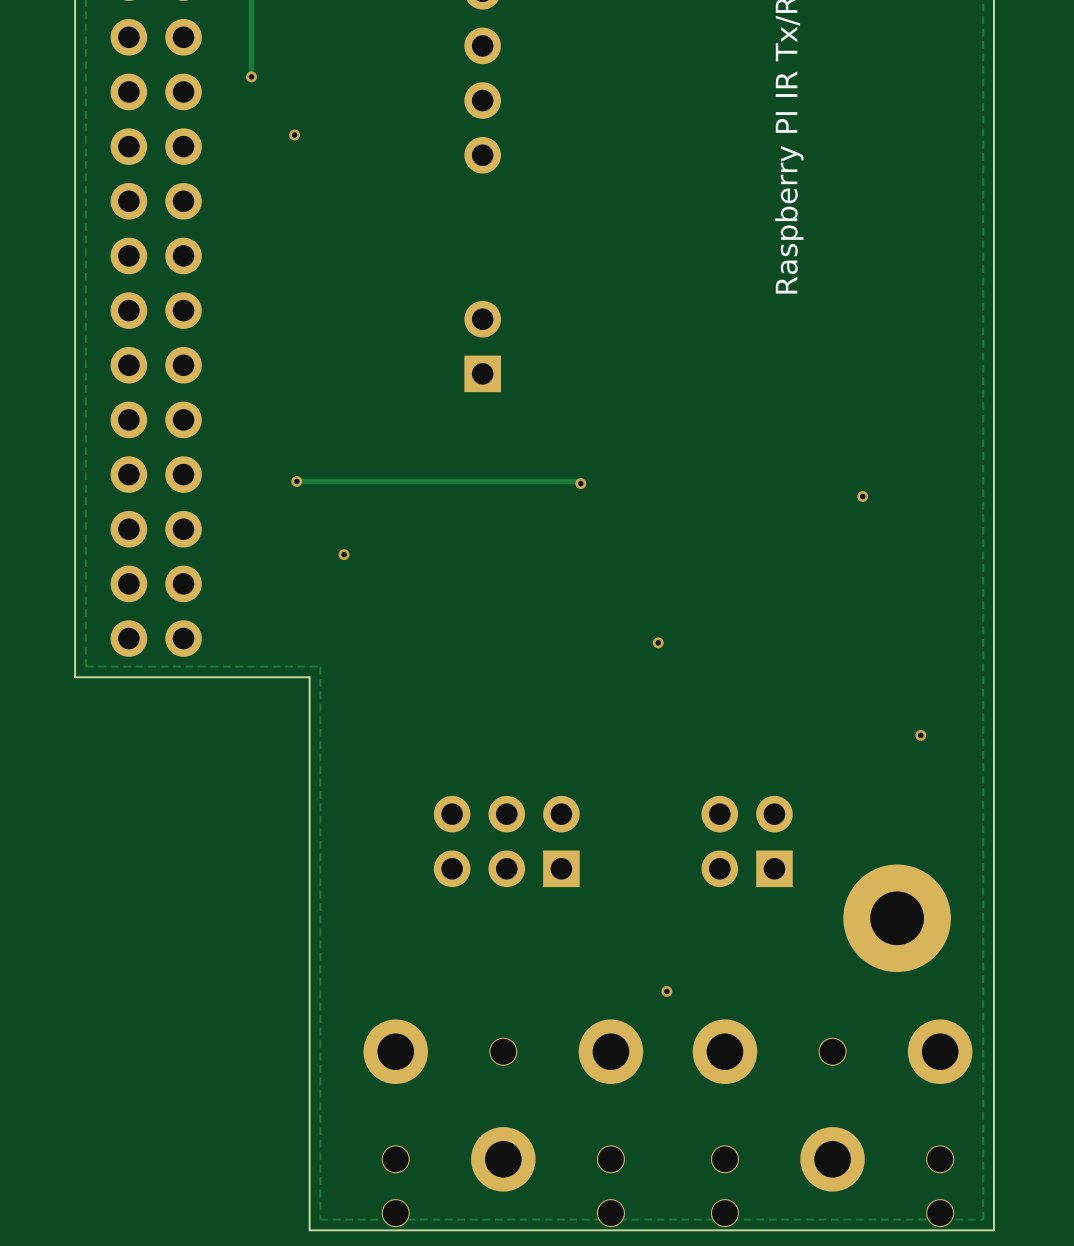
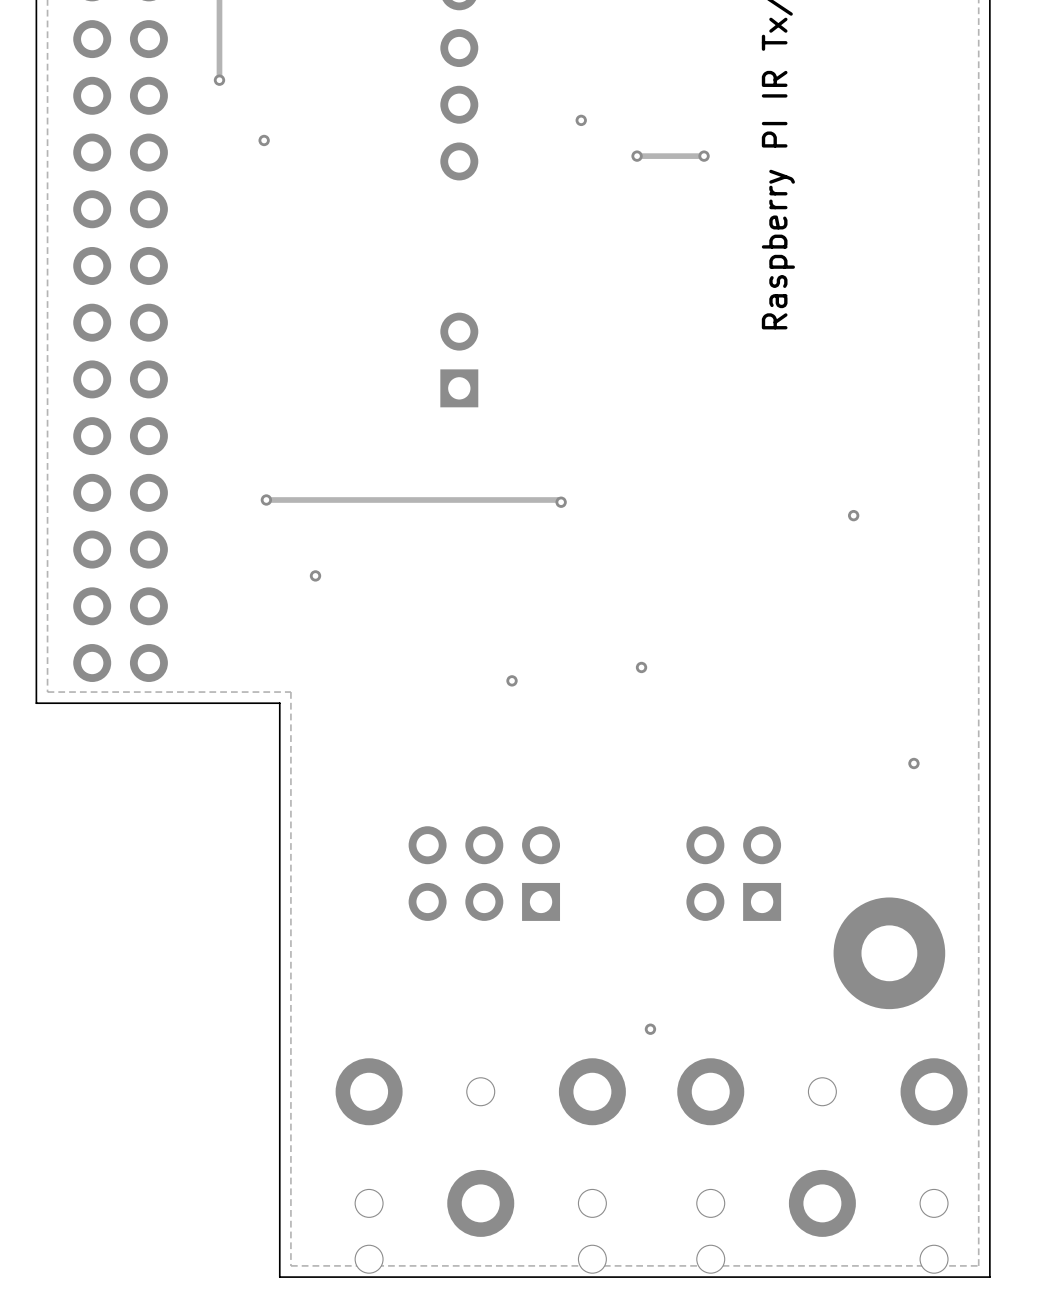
via: none -> (581, 120)
via: none -> (637, 156)
track: none -> (704, 156) (637, 156)
via: none -> (704, 156)
via: none -> (512, 680)

